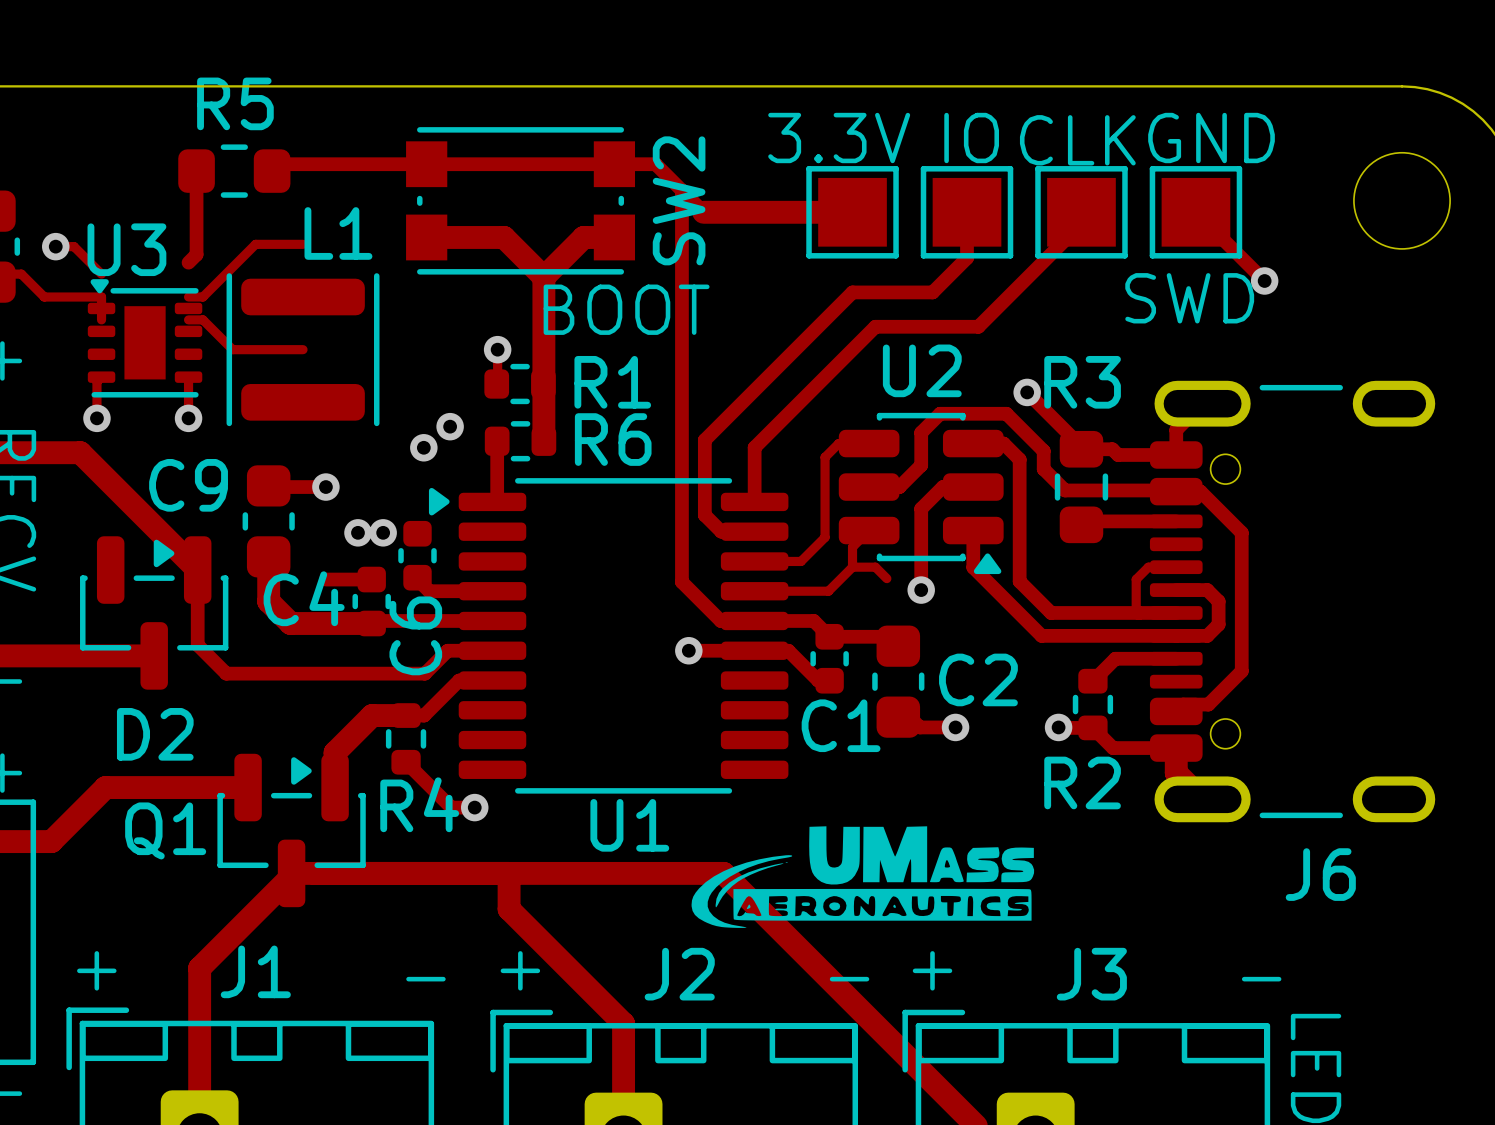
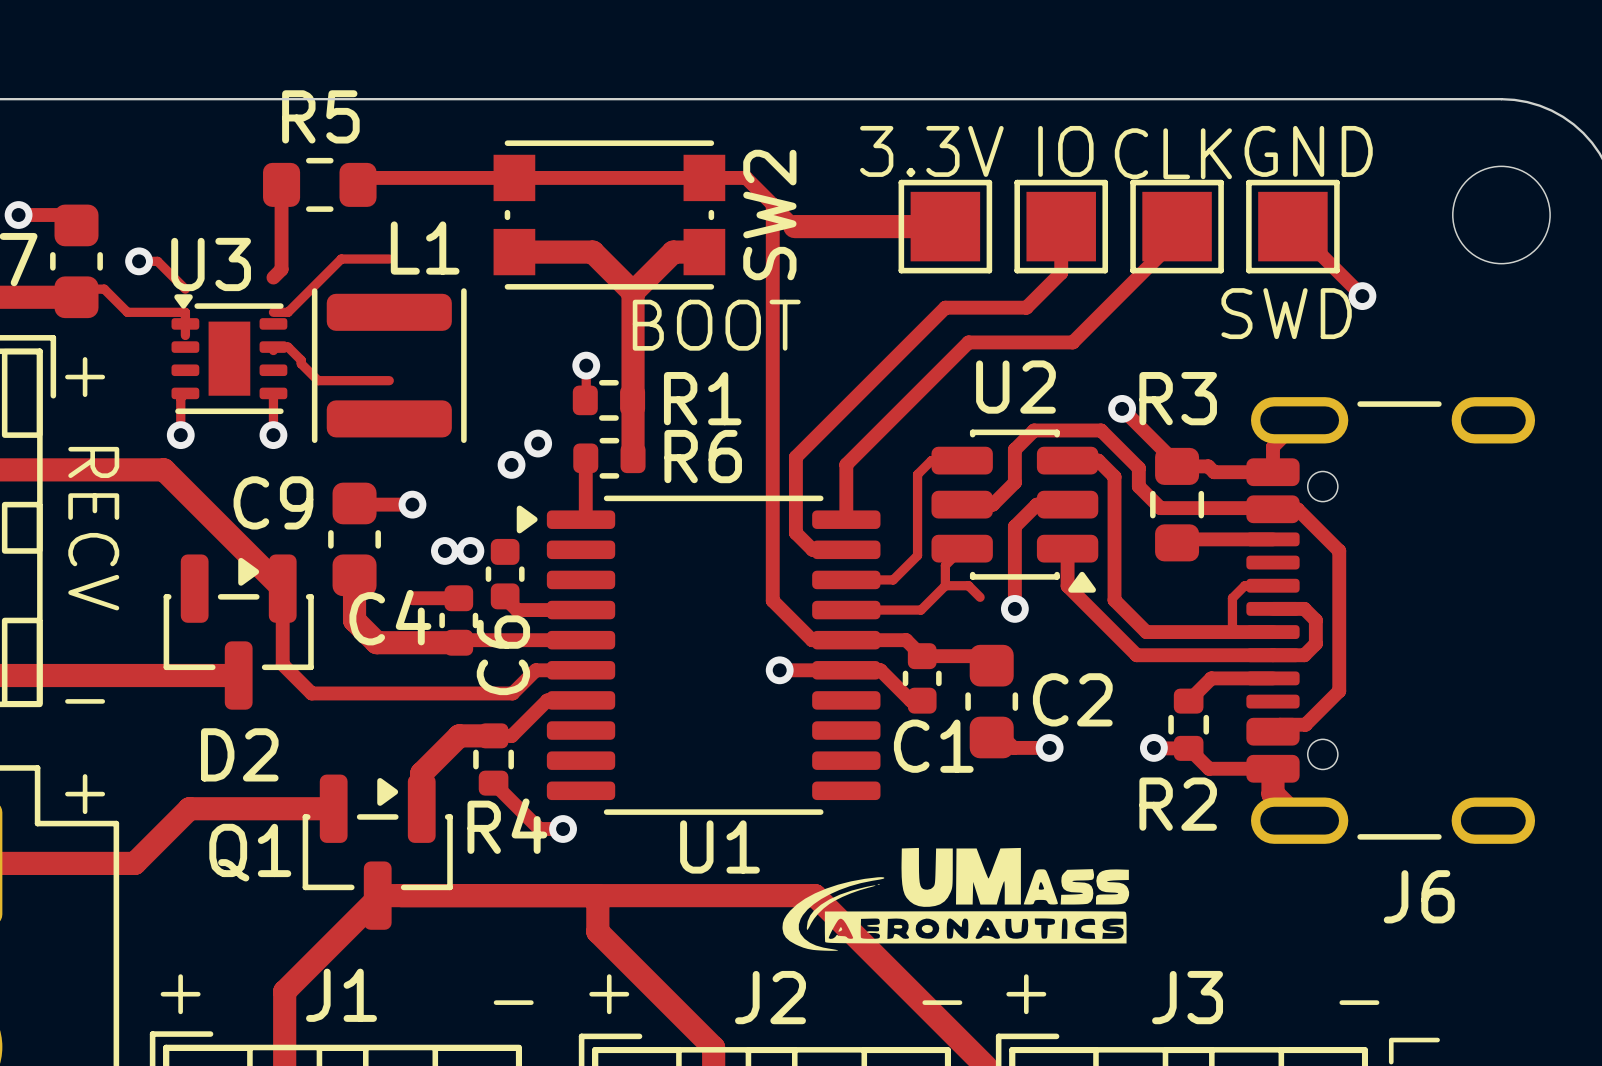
top track: (188, 319) (202, 319) (232, 349) (303, 349) -> none
top track: none -> (273, 350) (273, 347) (288, 347) (318, 380) (389, 380)

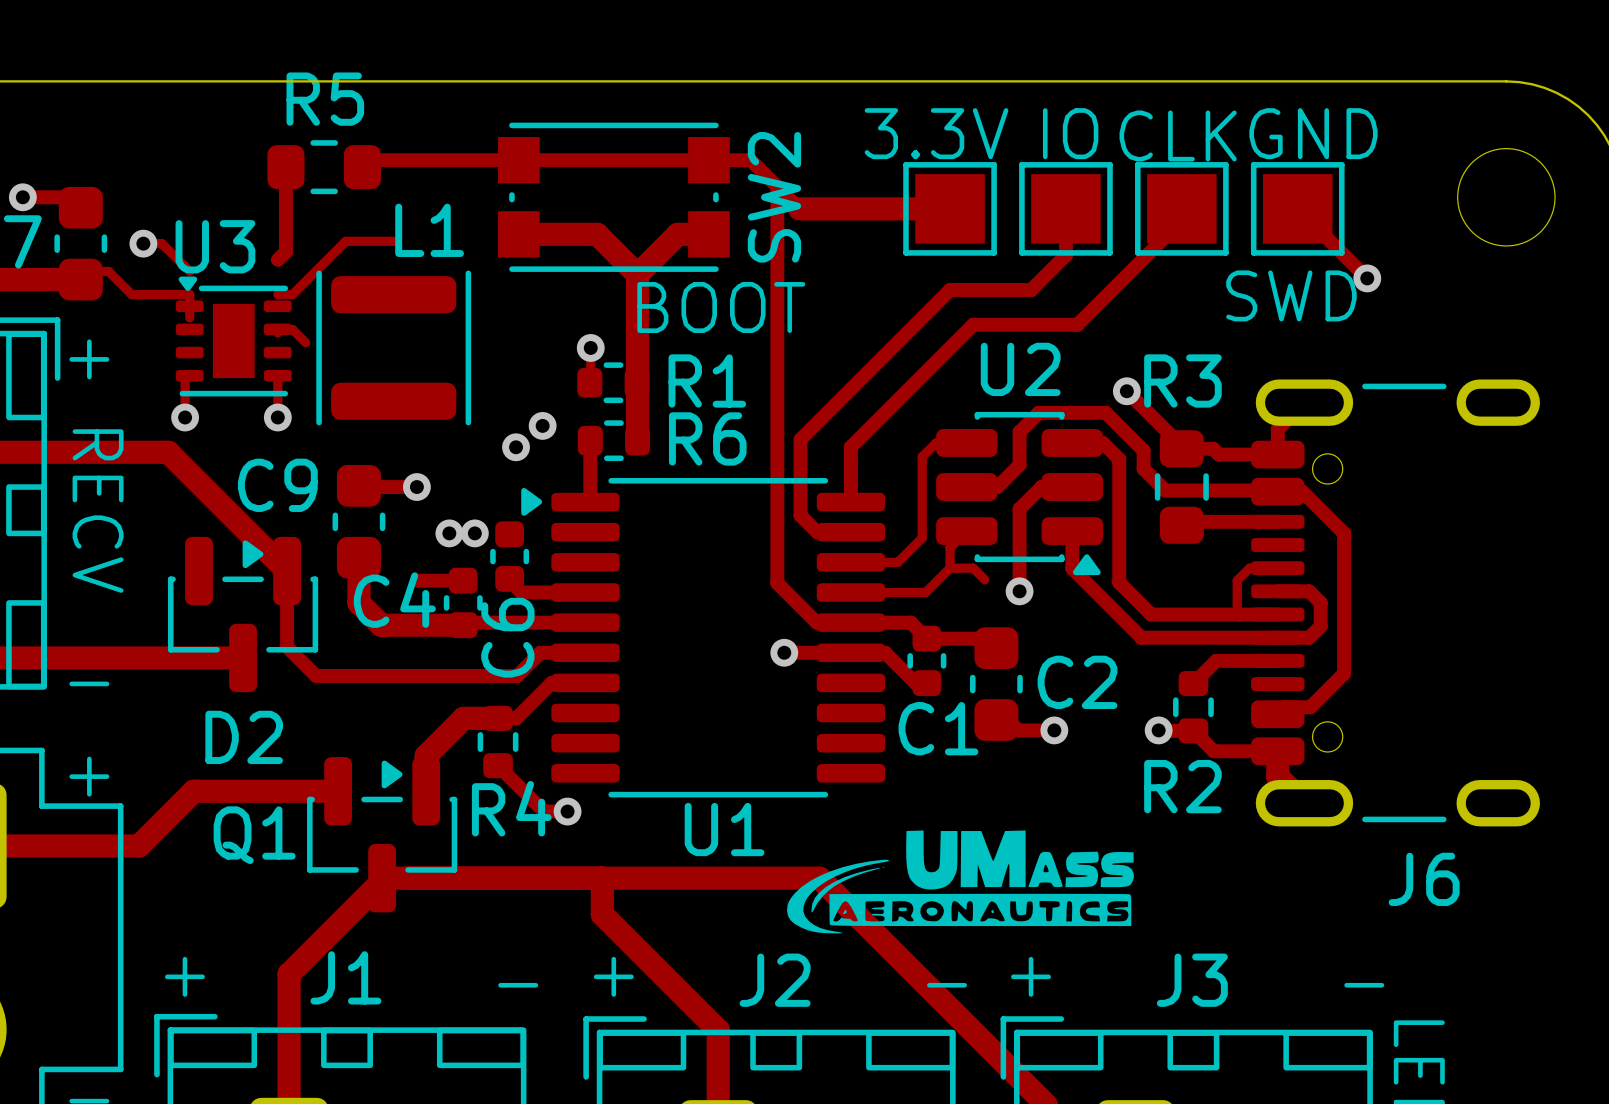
top track: (301, 360) (301, 363) (318, 380) (389, 380) -> none

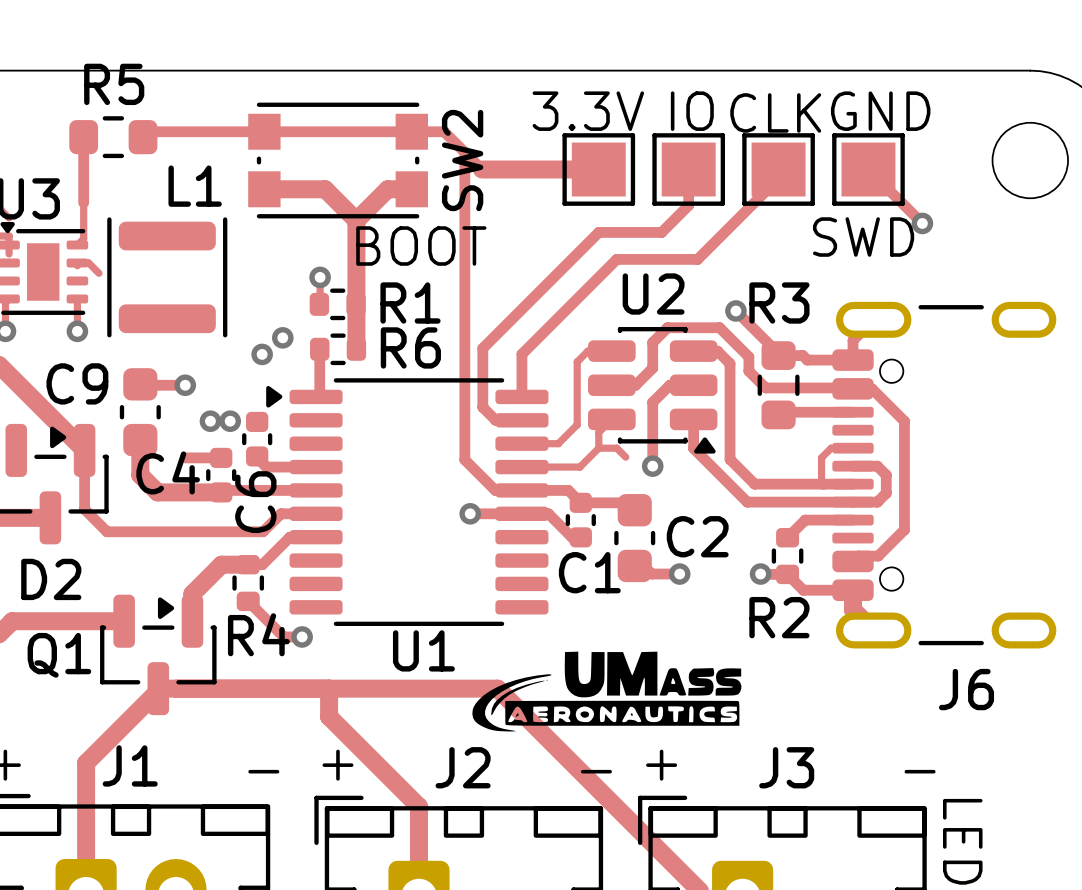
top track: (393, 241) (345, 241) (292, 294) (277, 294) -> none
top track: (285, 251) (277, 259) -> (83, 202) (83, 238) (77, 245)

